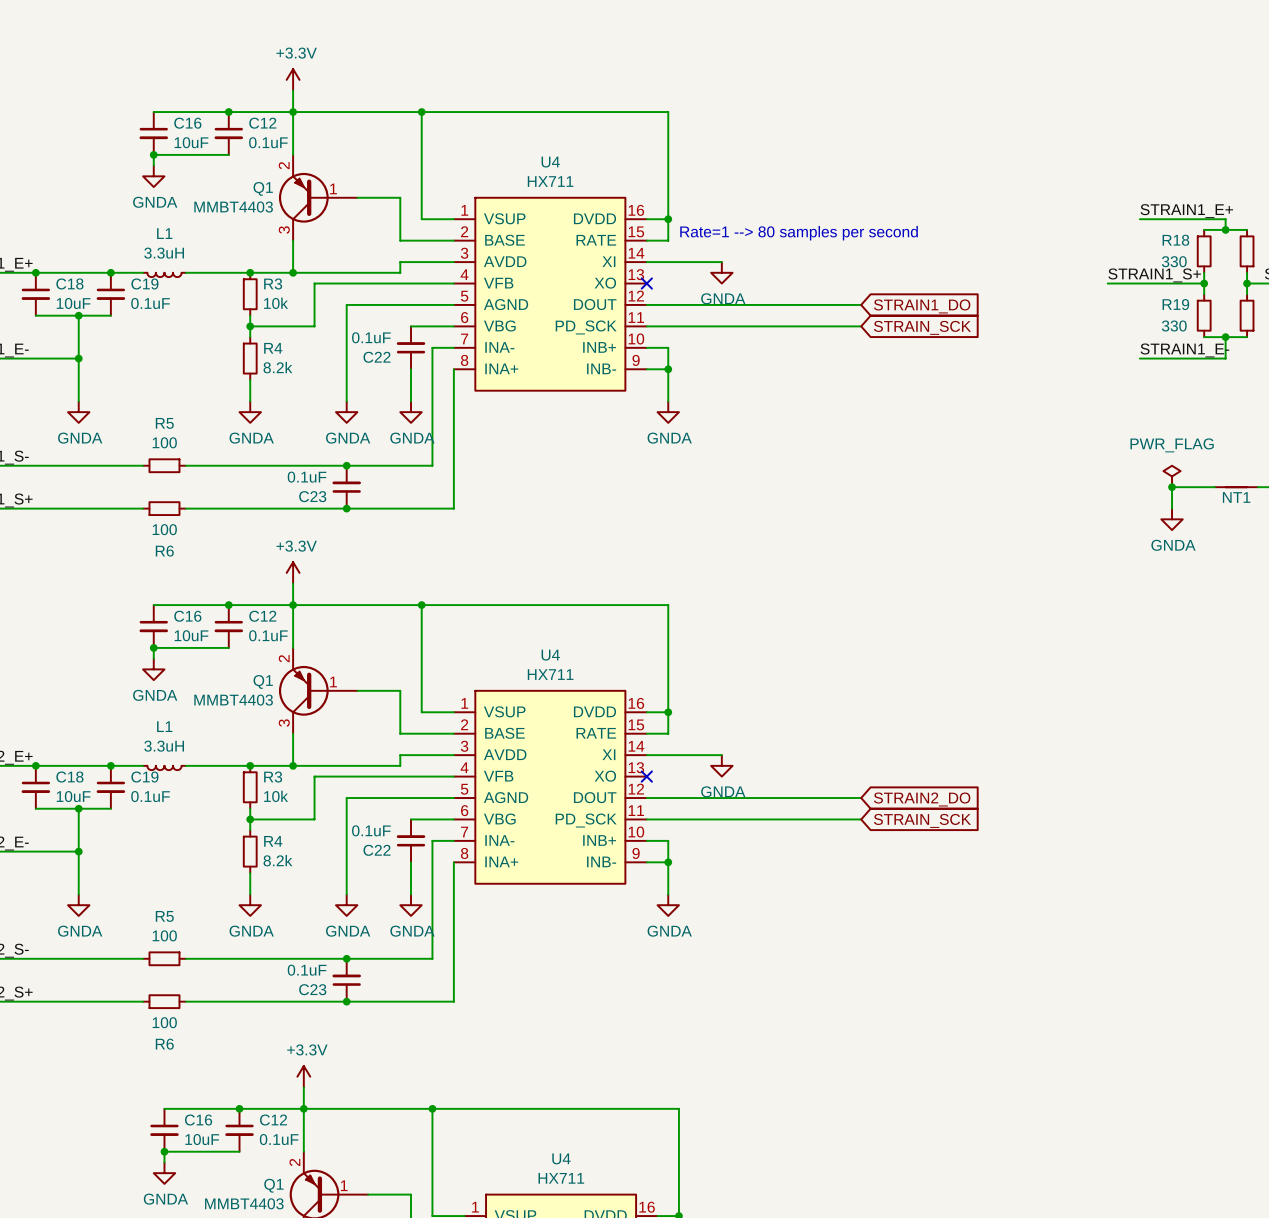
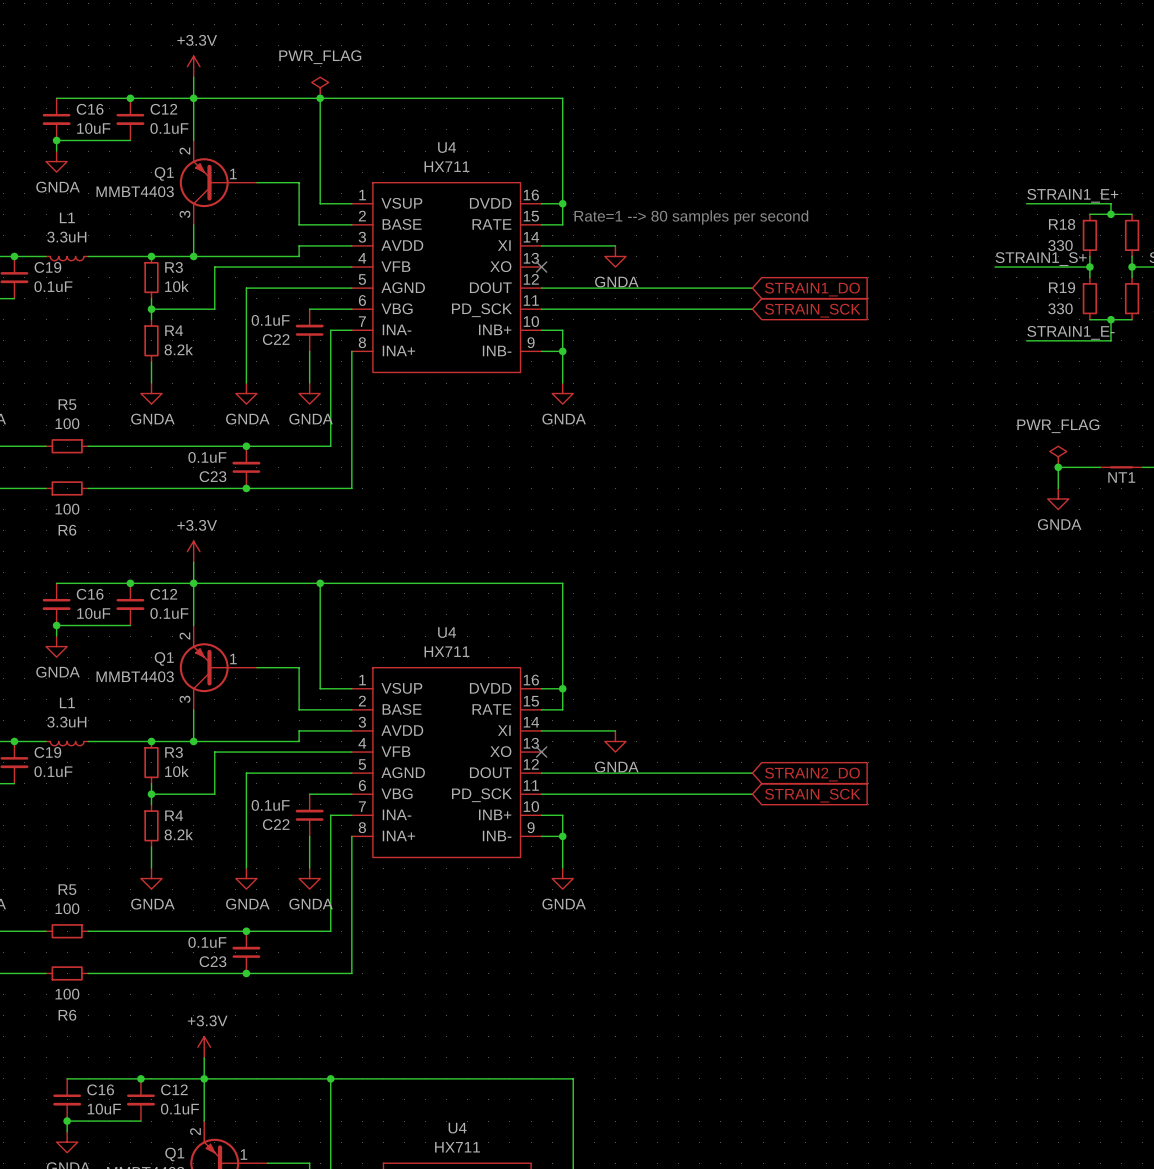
power symbol: none -> PWR_FLAG (320, 87)

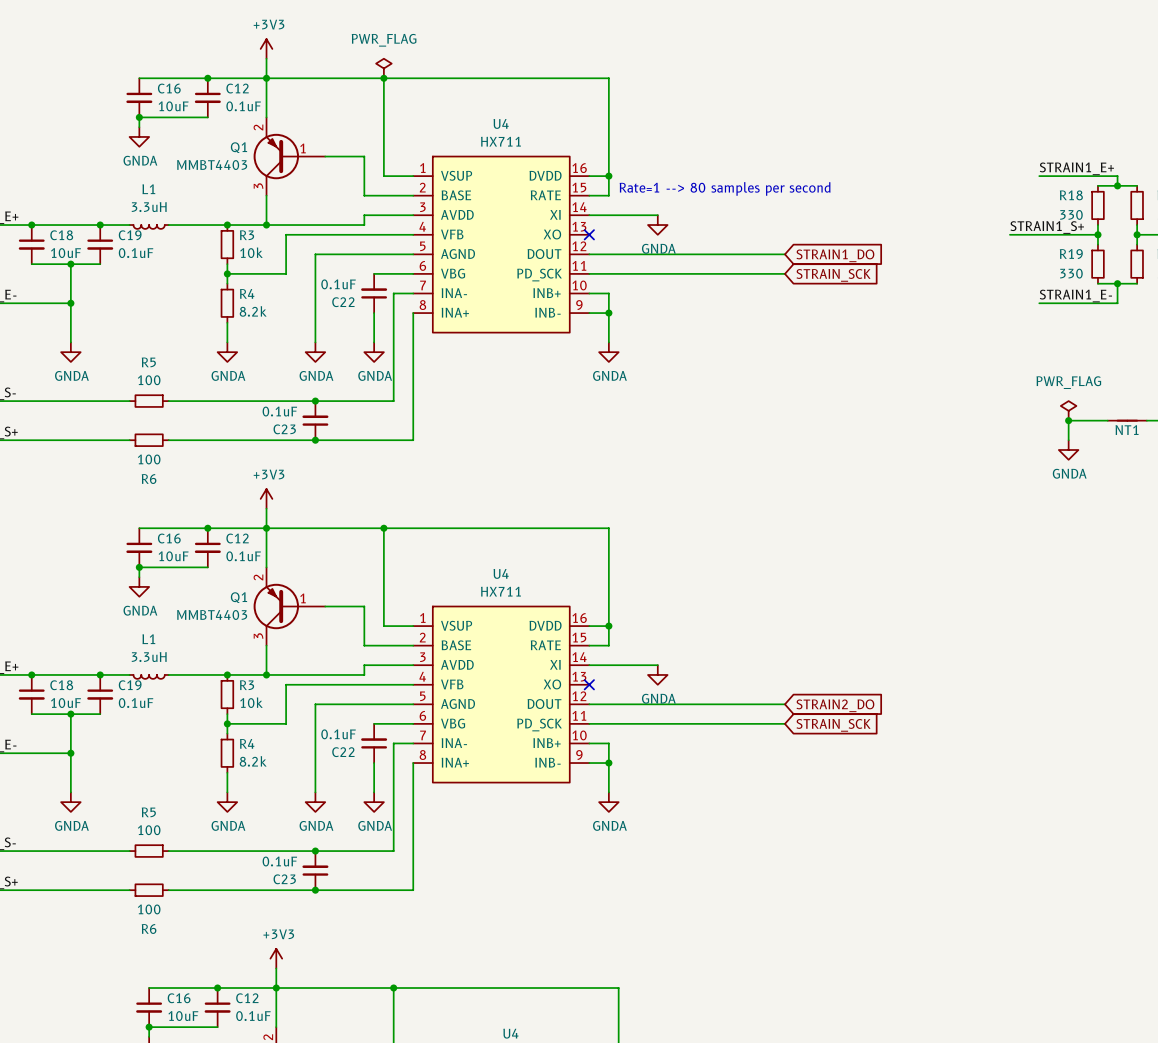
power symbol: +3.3V (193, 66) -> +3V3 (266, 48)
power symbol: +3.3V (193, 551) -> +3V3 (266, 498)
power symbol: +3.3V (204, 1047) -> +3V3 (276, 958)

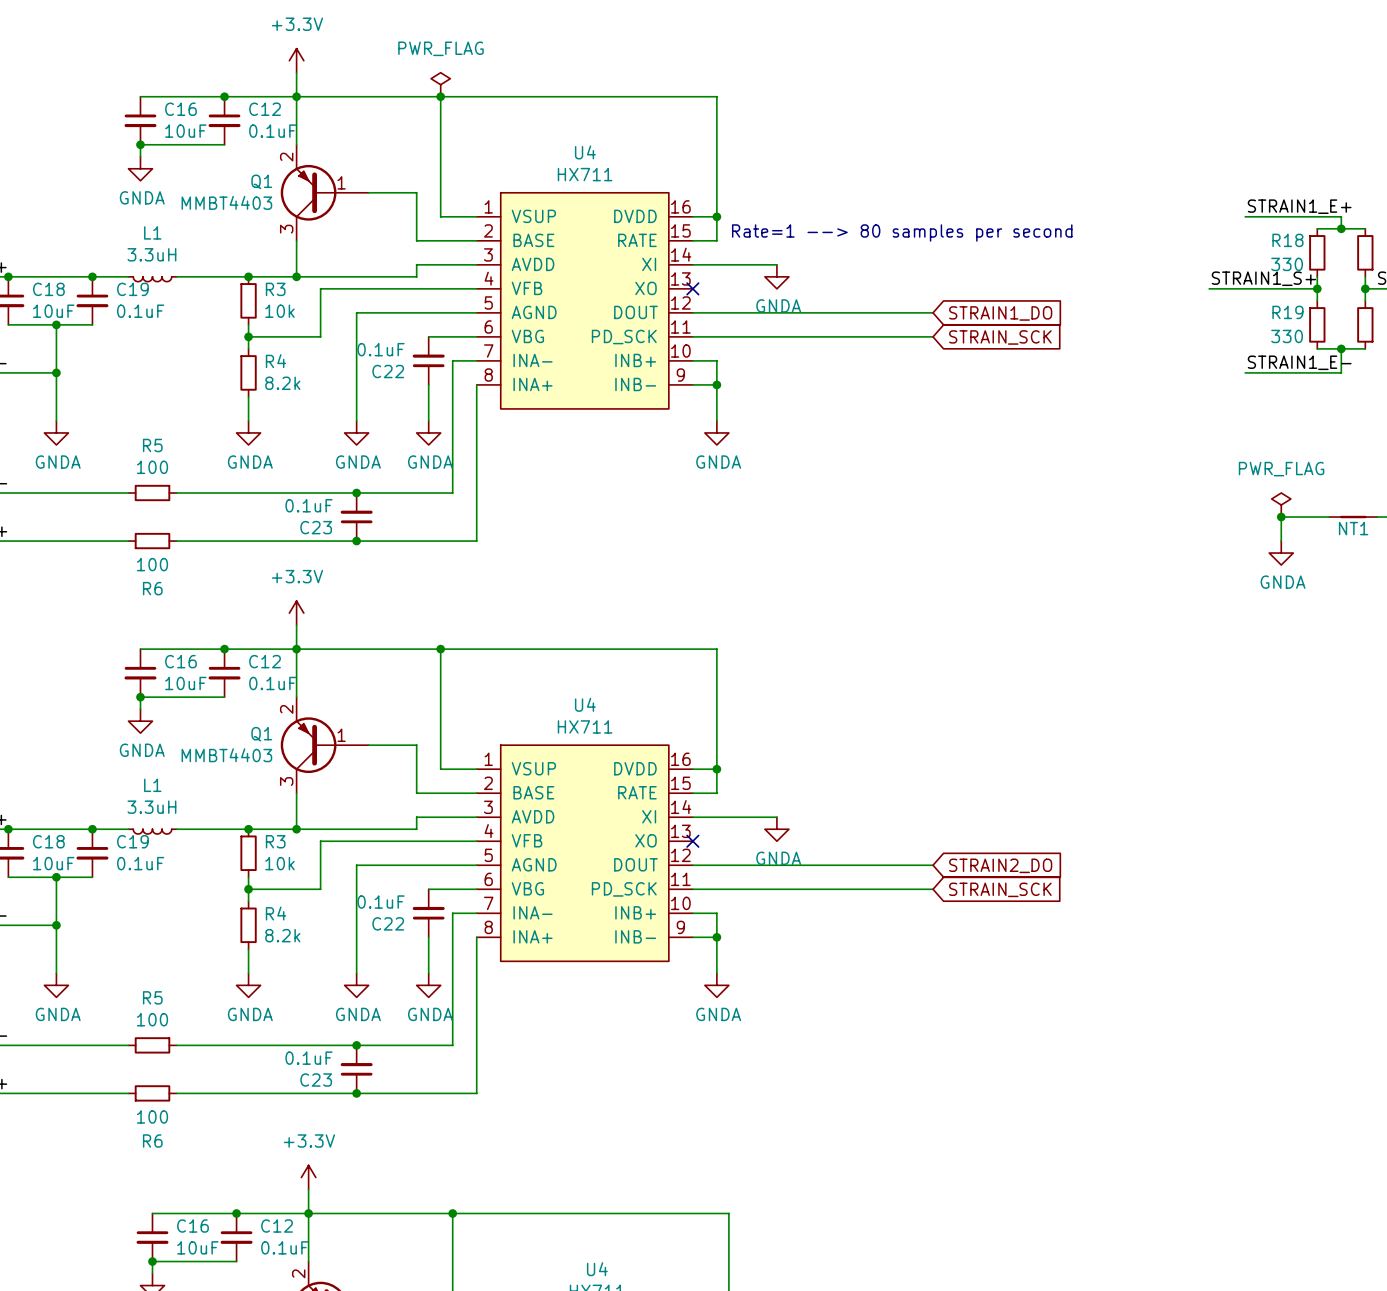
power symbol: +3V3 (266, 48) -> +3.3V (296, 60)
power symbol: +3V3 (266, 498) -> +3.3V (296, 613)
power symbol: +3V3 (276, 958) -> +3.3V (308, 1177)

